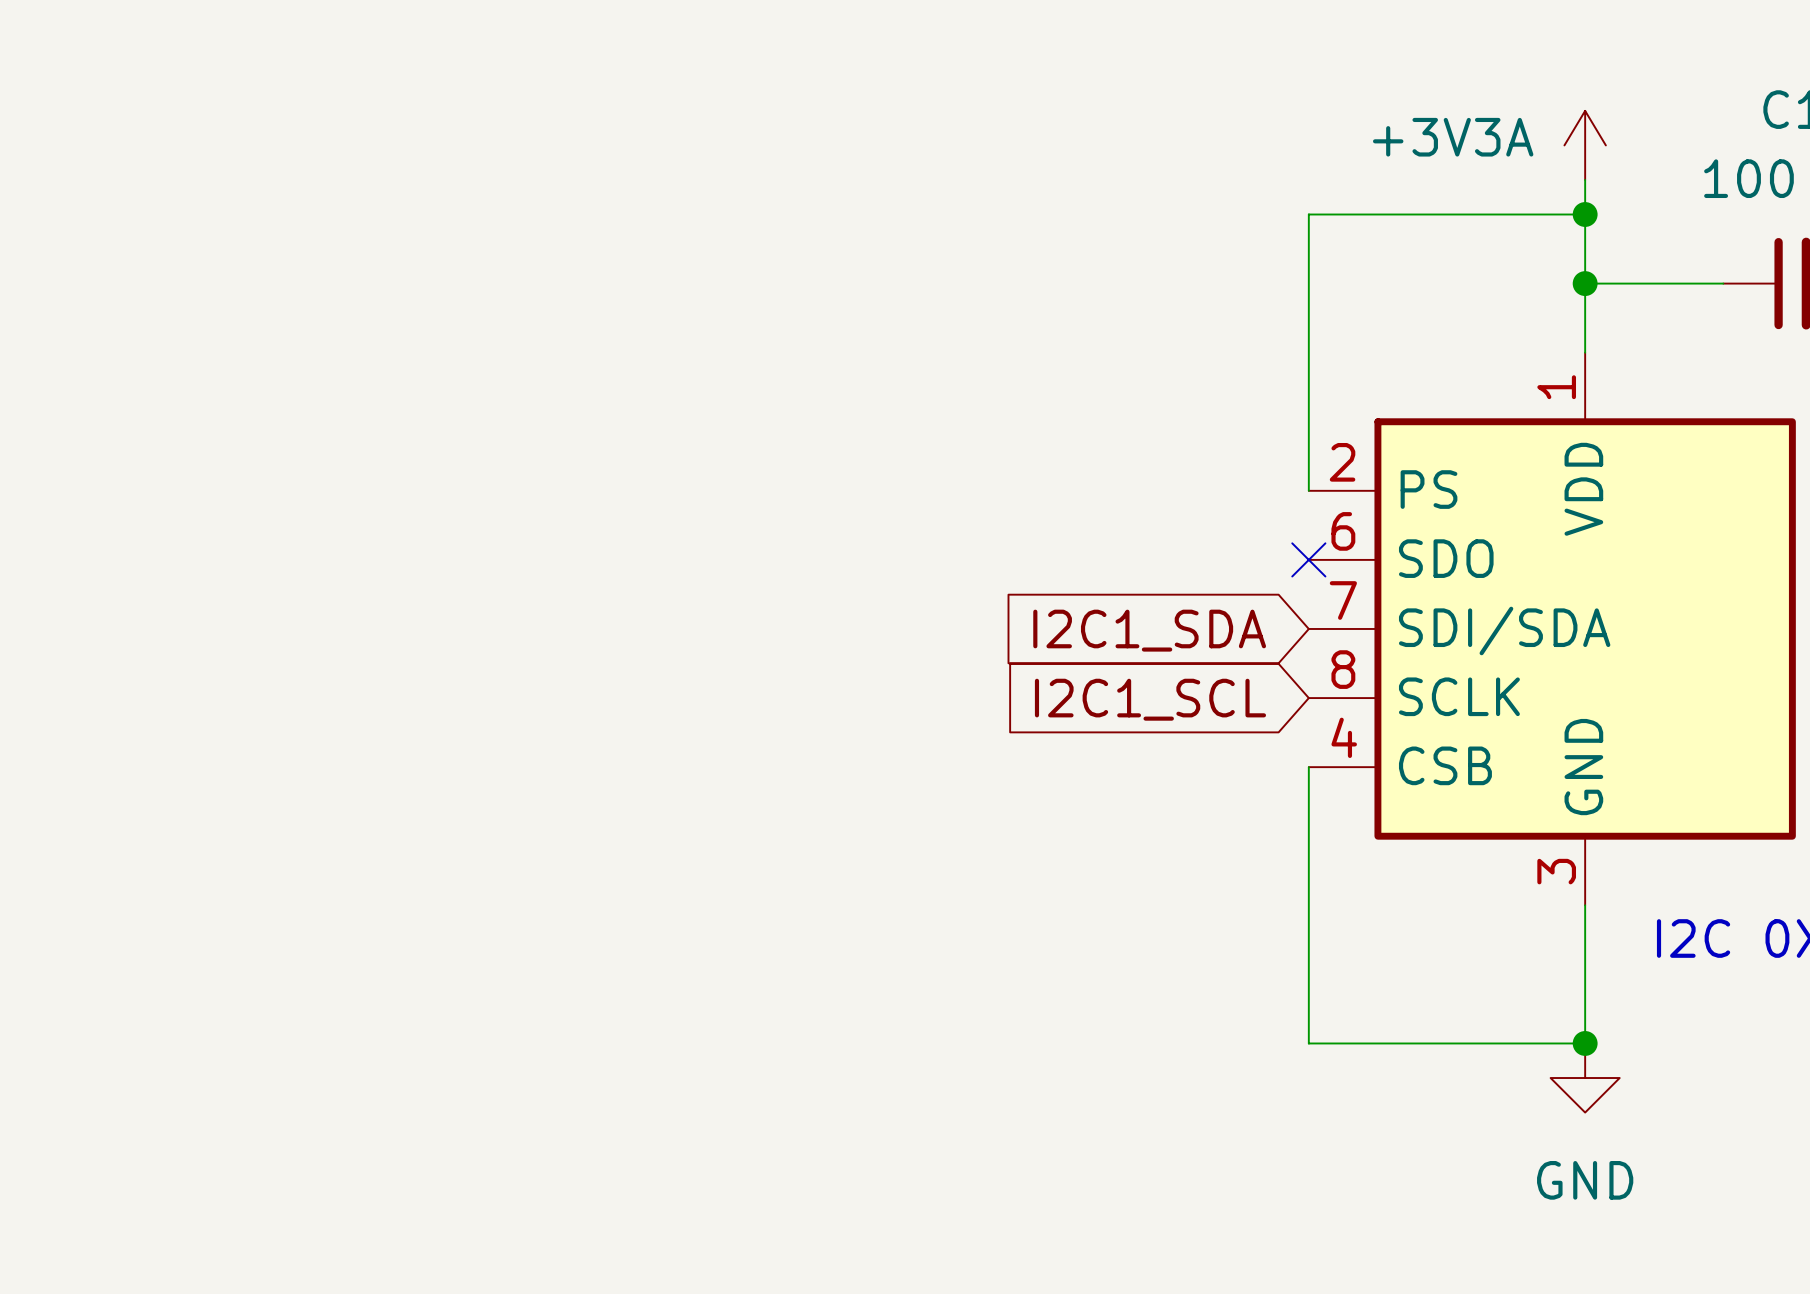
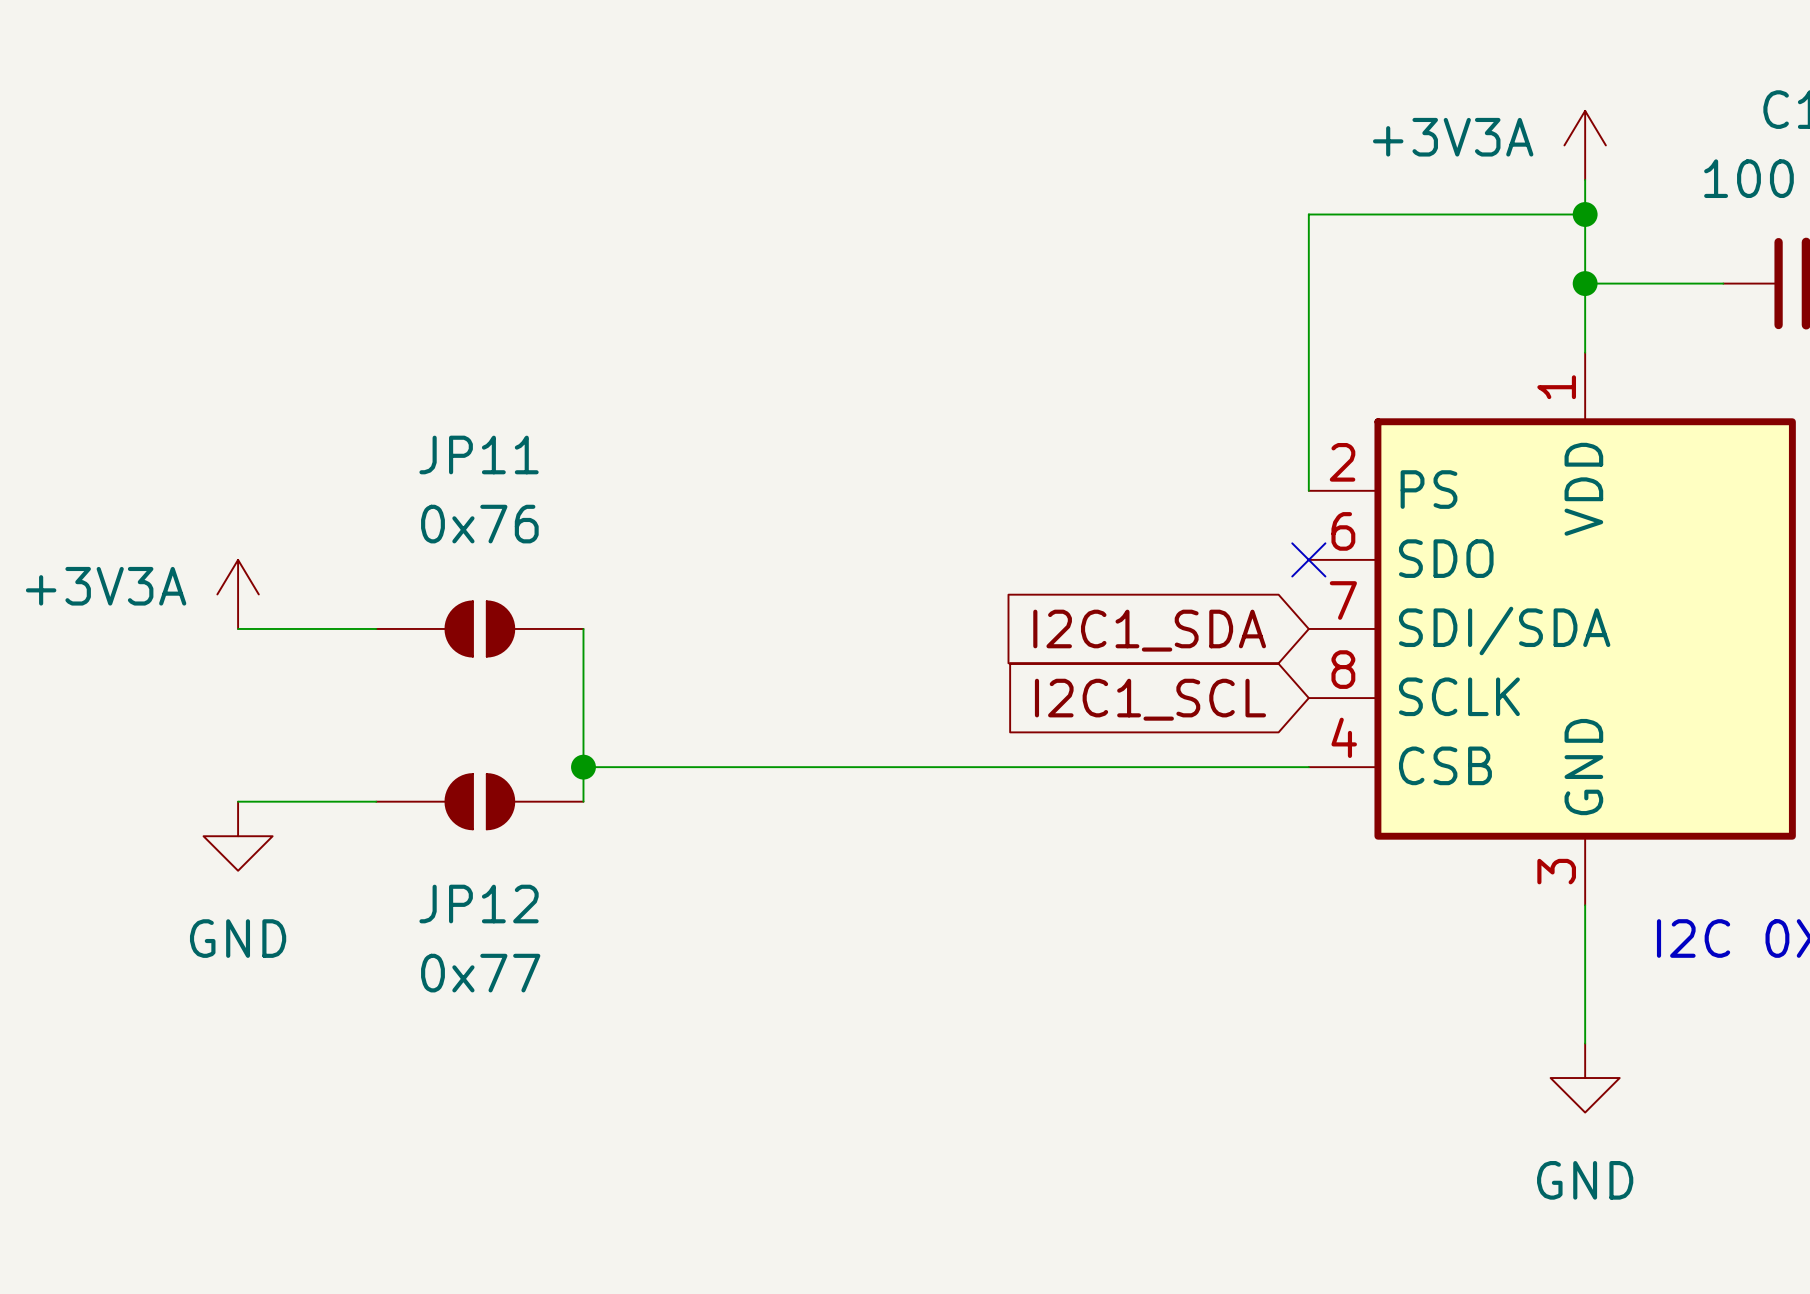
power symbol: none -> +3V3A (238, 594)
wire: none -> (238, 628) (376, 628)
JP11: none -> 0x76 (479, 628)
wire: none -> (583, 628) (583, 801)
junction: none -> (583, 767)
wire: (1308, 767) (1308, 1043) (1585, 1043) -> (1308, 767) (583, 767)
wire: none -> (238, 801) (376, 801)
JP12: none -> 0x77 (479, 801)
power symbol: none -> GND (238, 836)
junction: (1585, 1043) -> none

